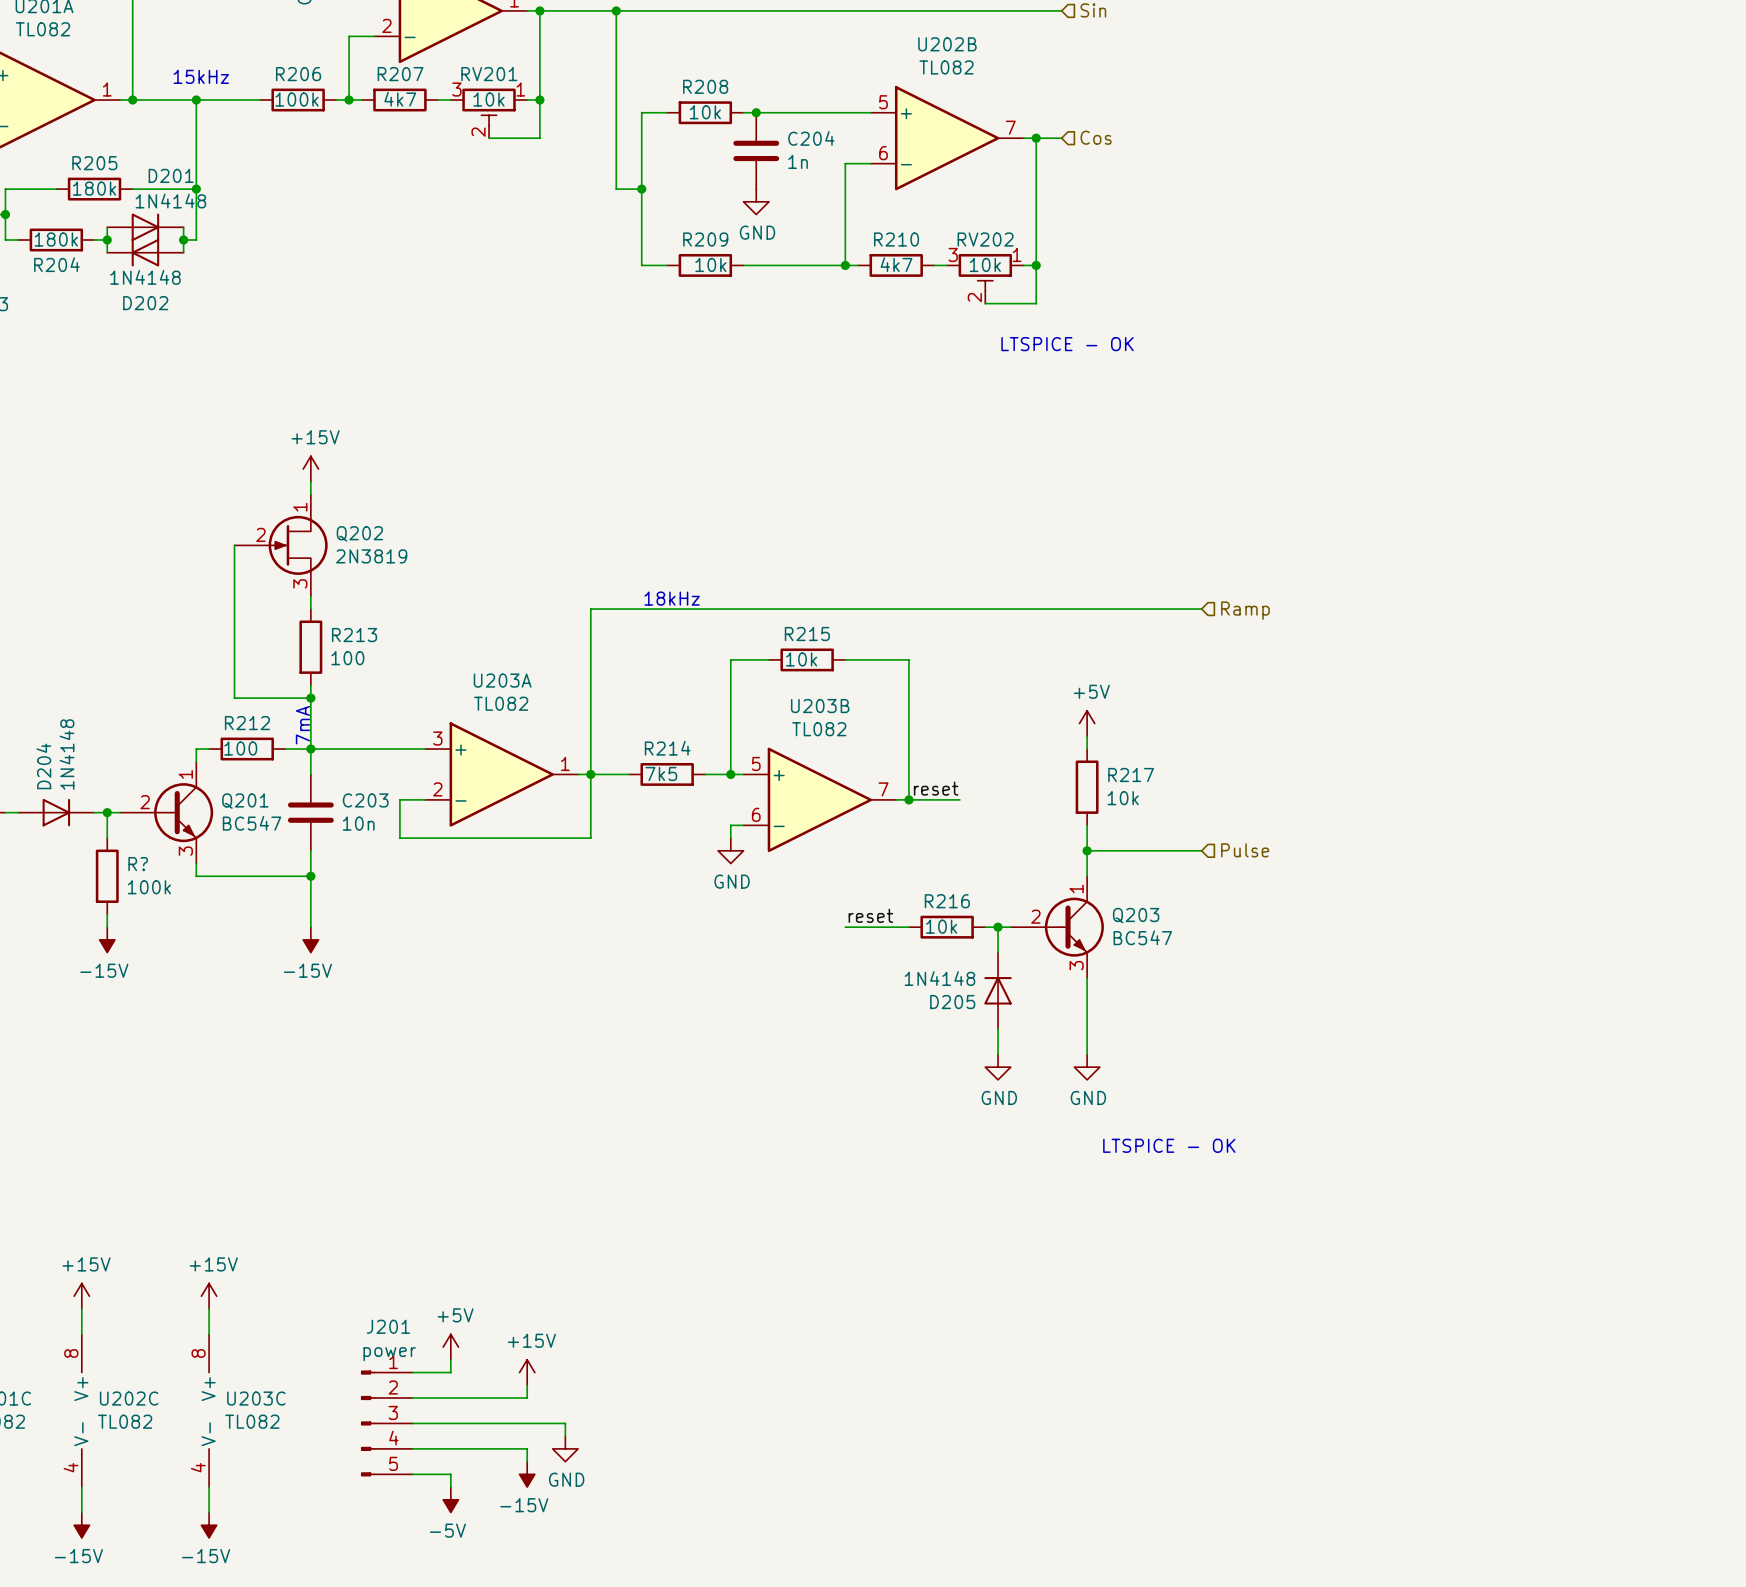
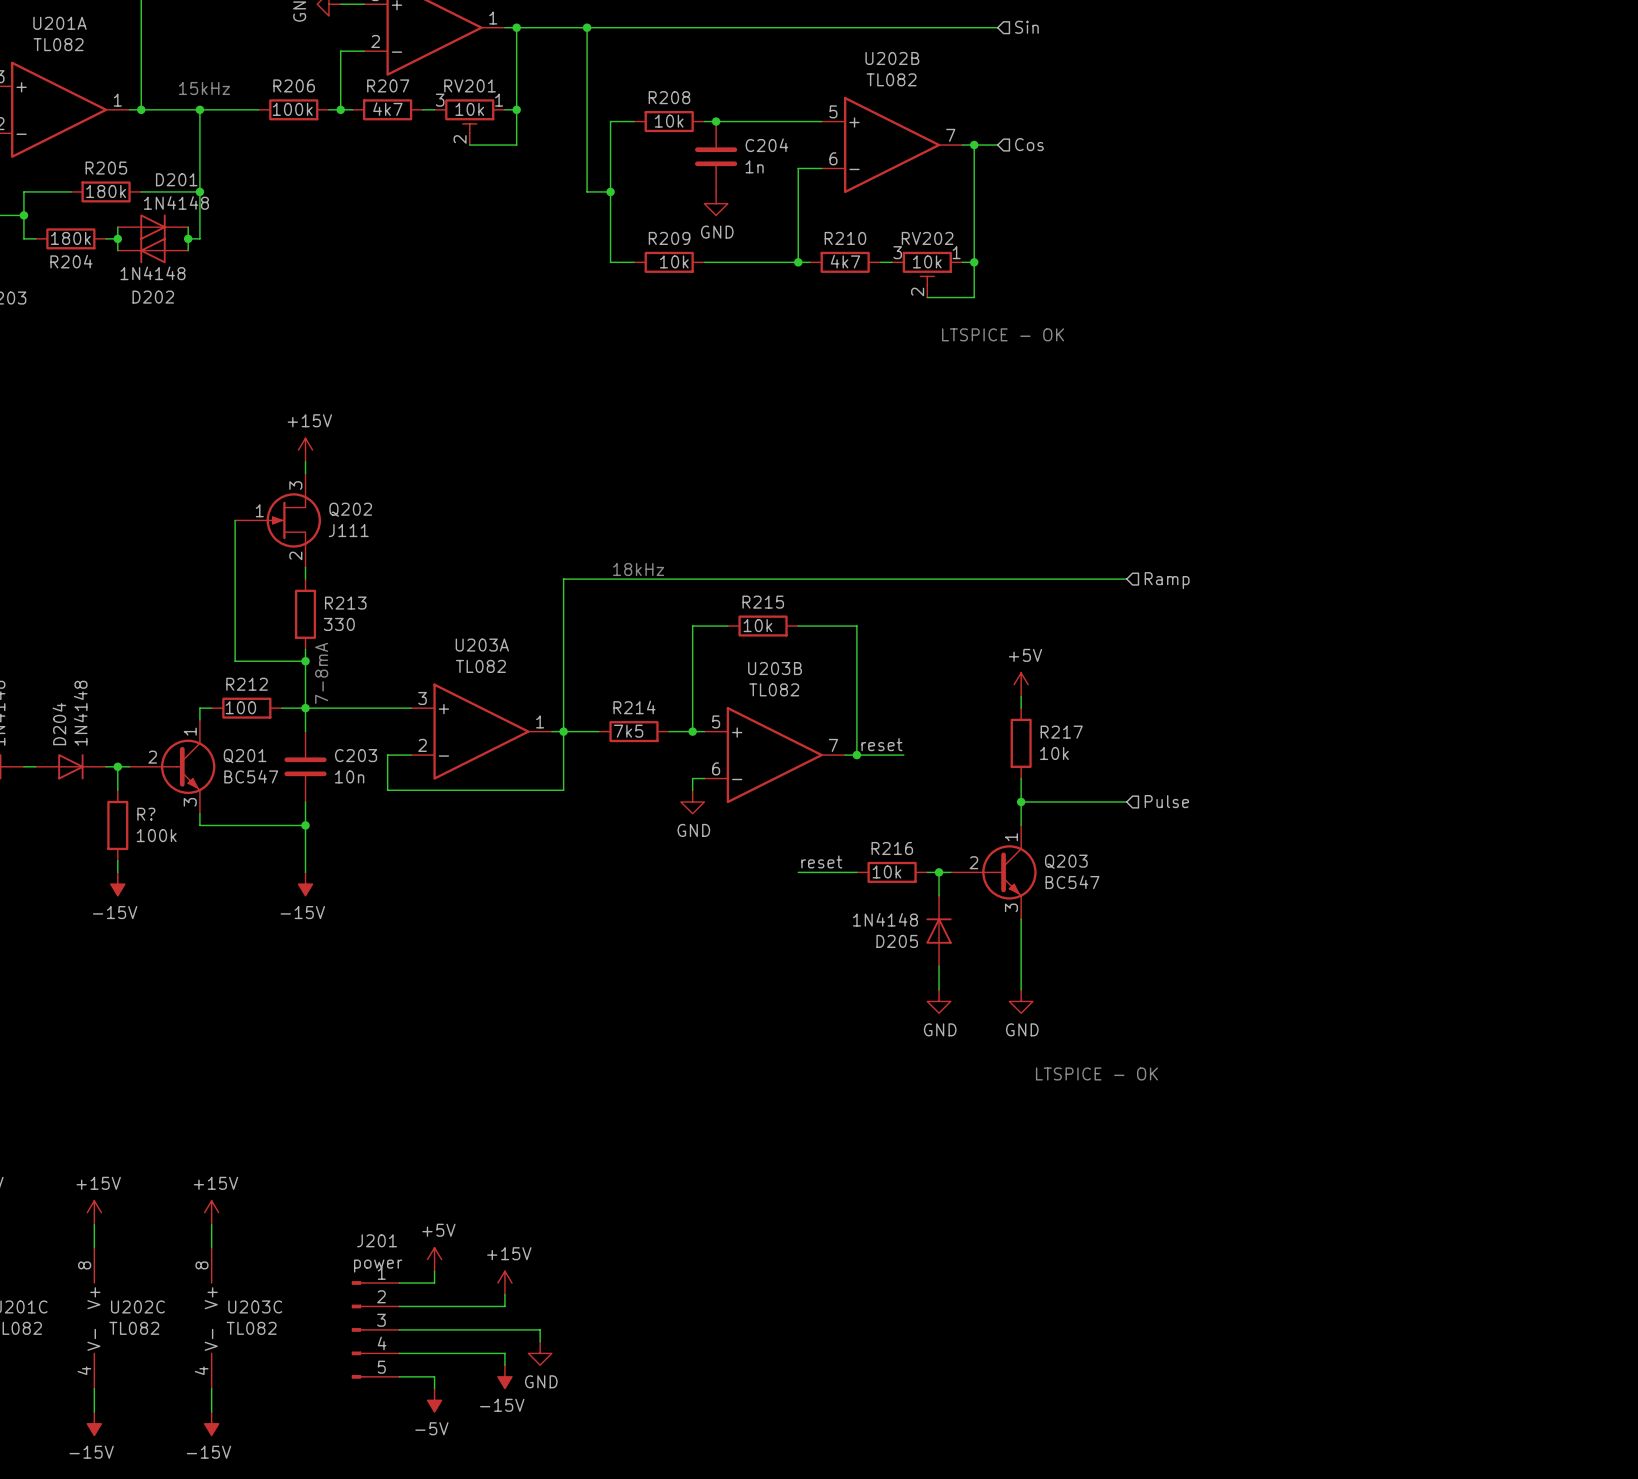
Q202 pin number: 1 (300, 507) -> 3 (295, 485)
Q202 pin number: 2 (260, 534) -> 1 (259, 510)
Q202 value: 2N3819 (371, 556) -> J111 (348, 530)
Q202 pin number: 3 (300, 583) -> 2 (295, 555)
R213 value: 100 (347, 658) -> 330 (339, 624)
text: 7mA (302, 725) -> 7-8mA (321, 673)

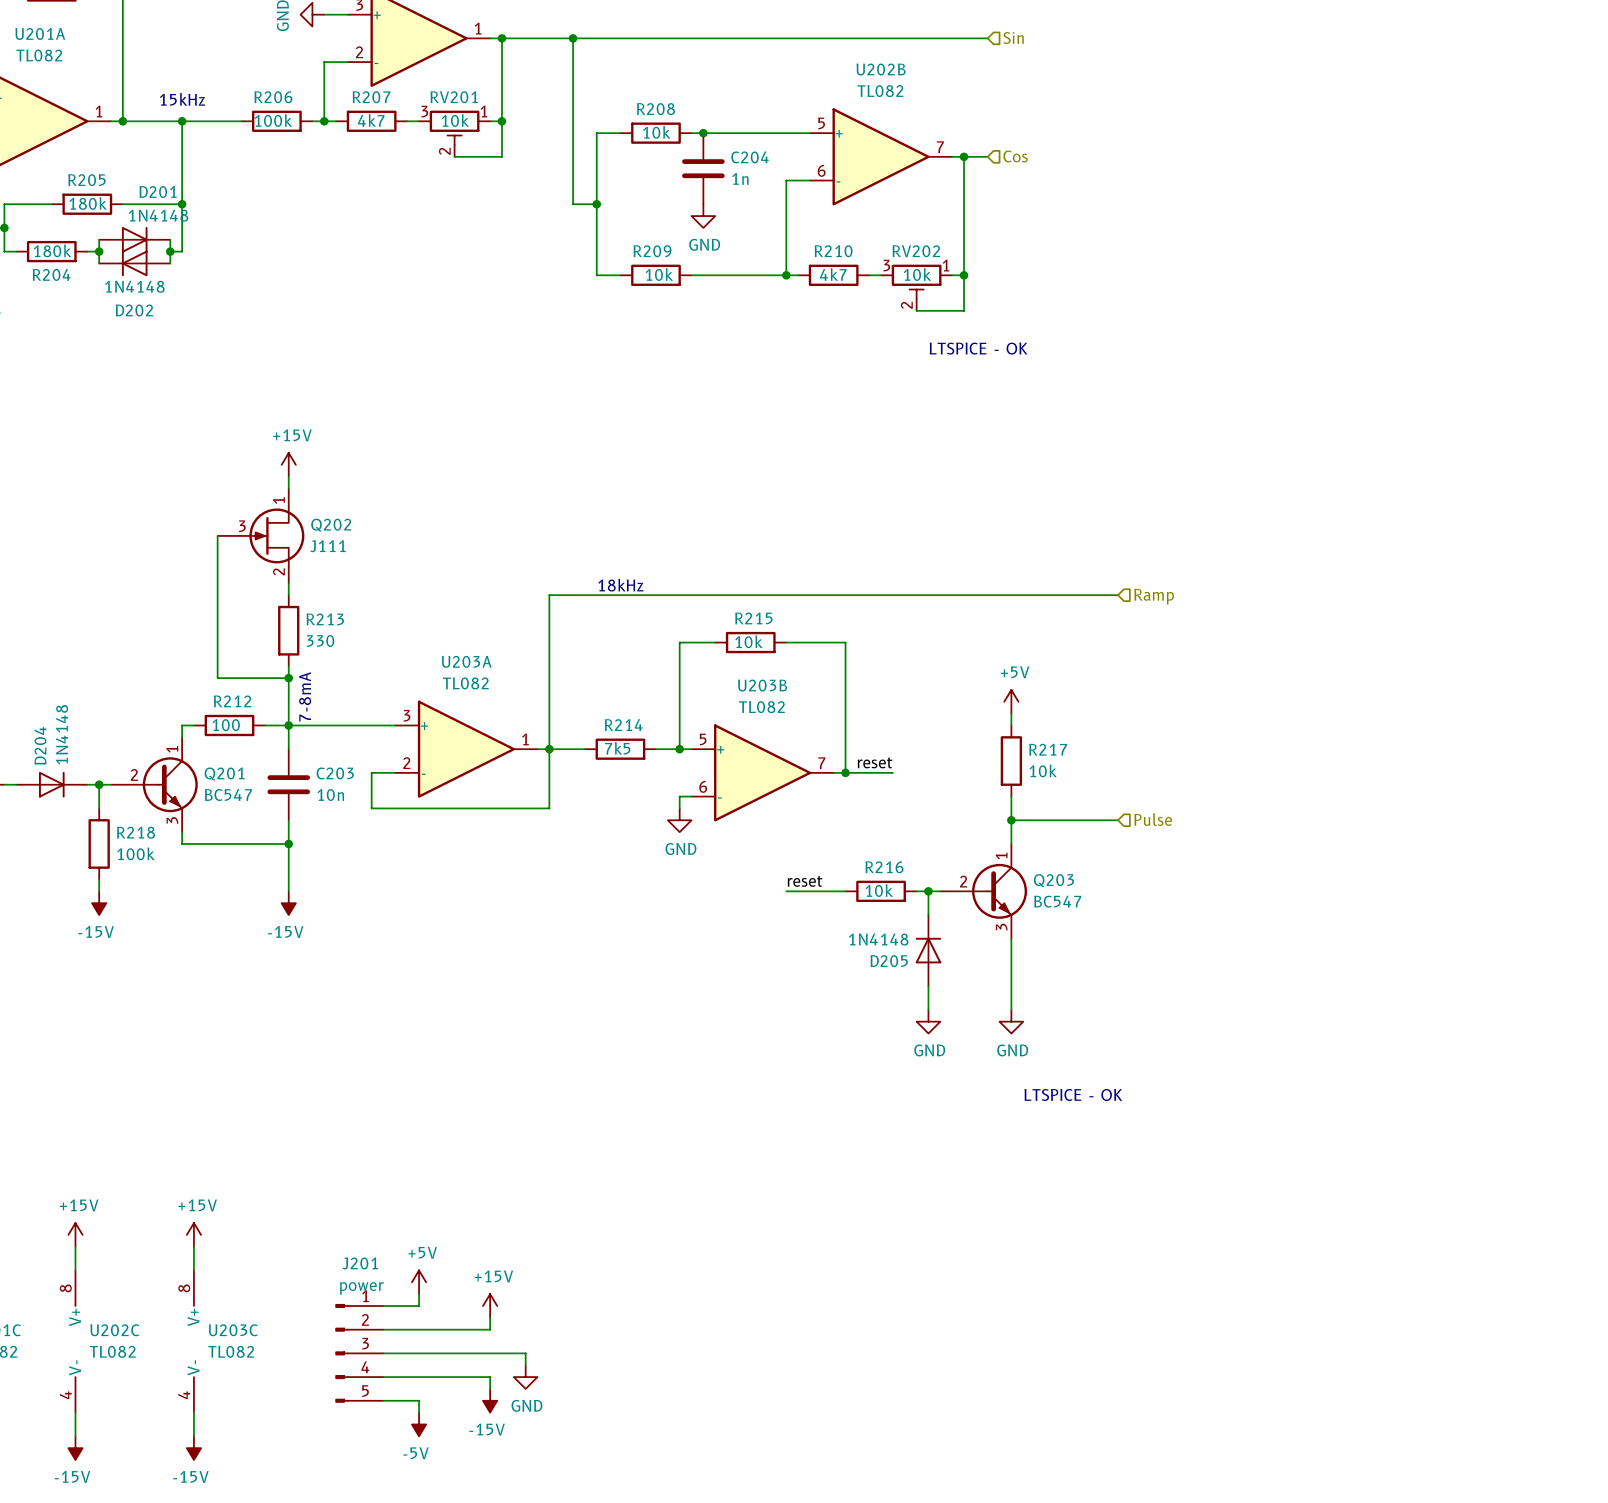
Q202 pin number: 3 (295, 485) -> 1 (278, 500)
Q202 pin number: 1 (259, 510) -> 3 (242, 526)
R? name: R? (146, 814) -> R218 (135, 832)

